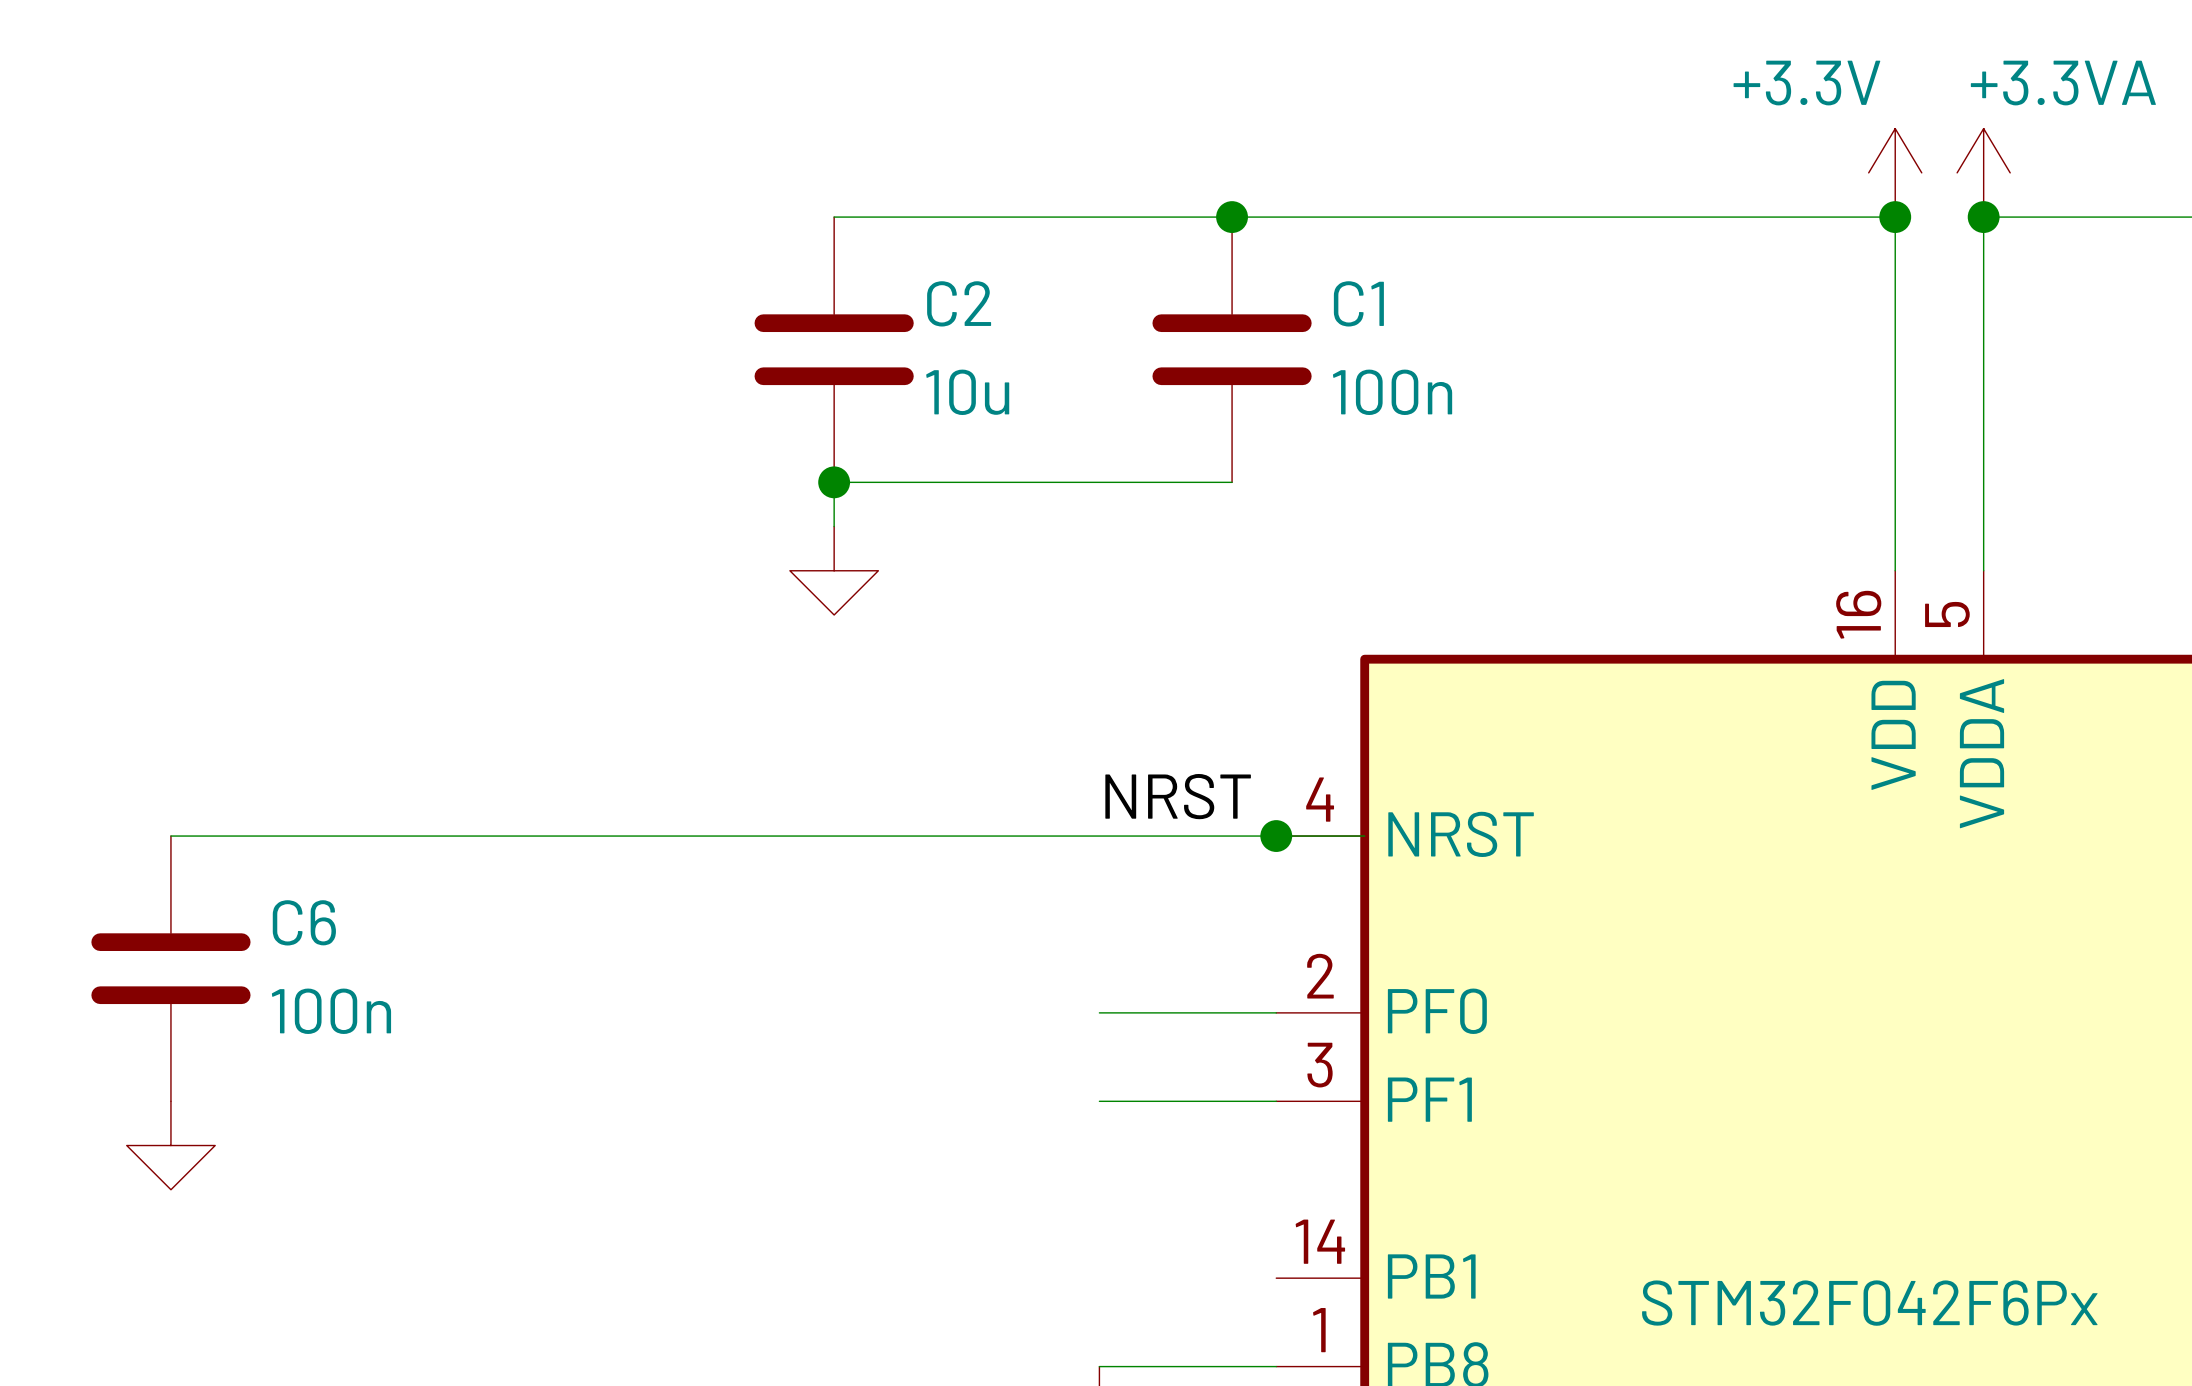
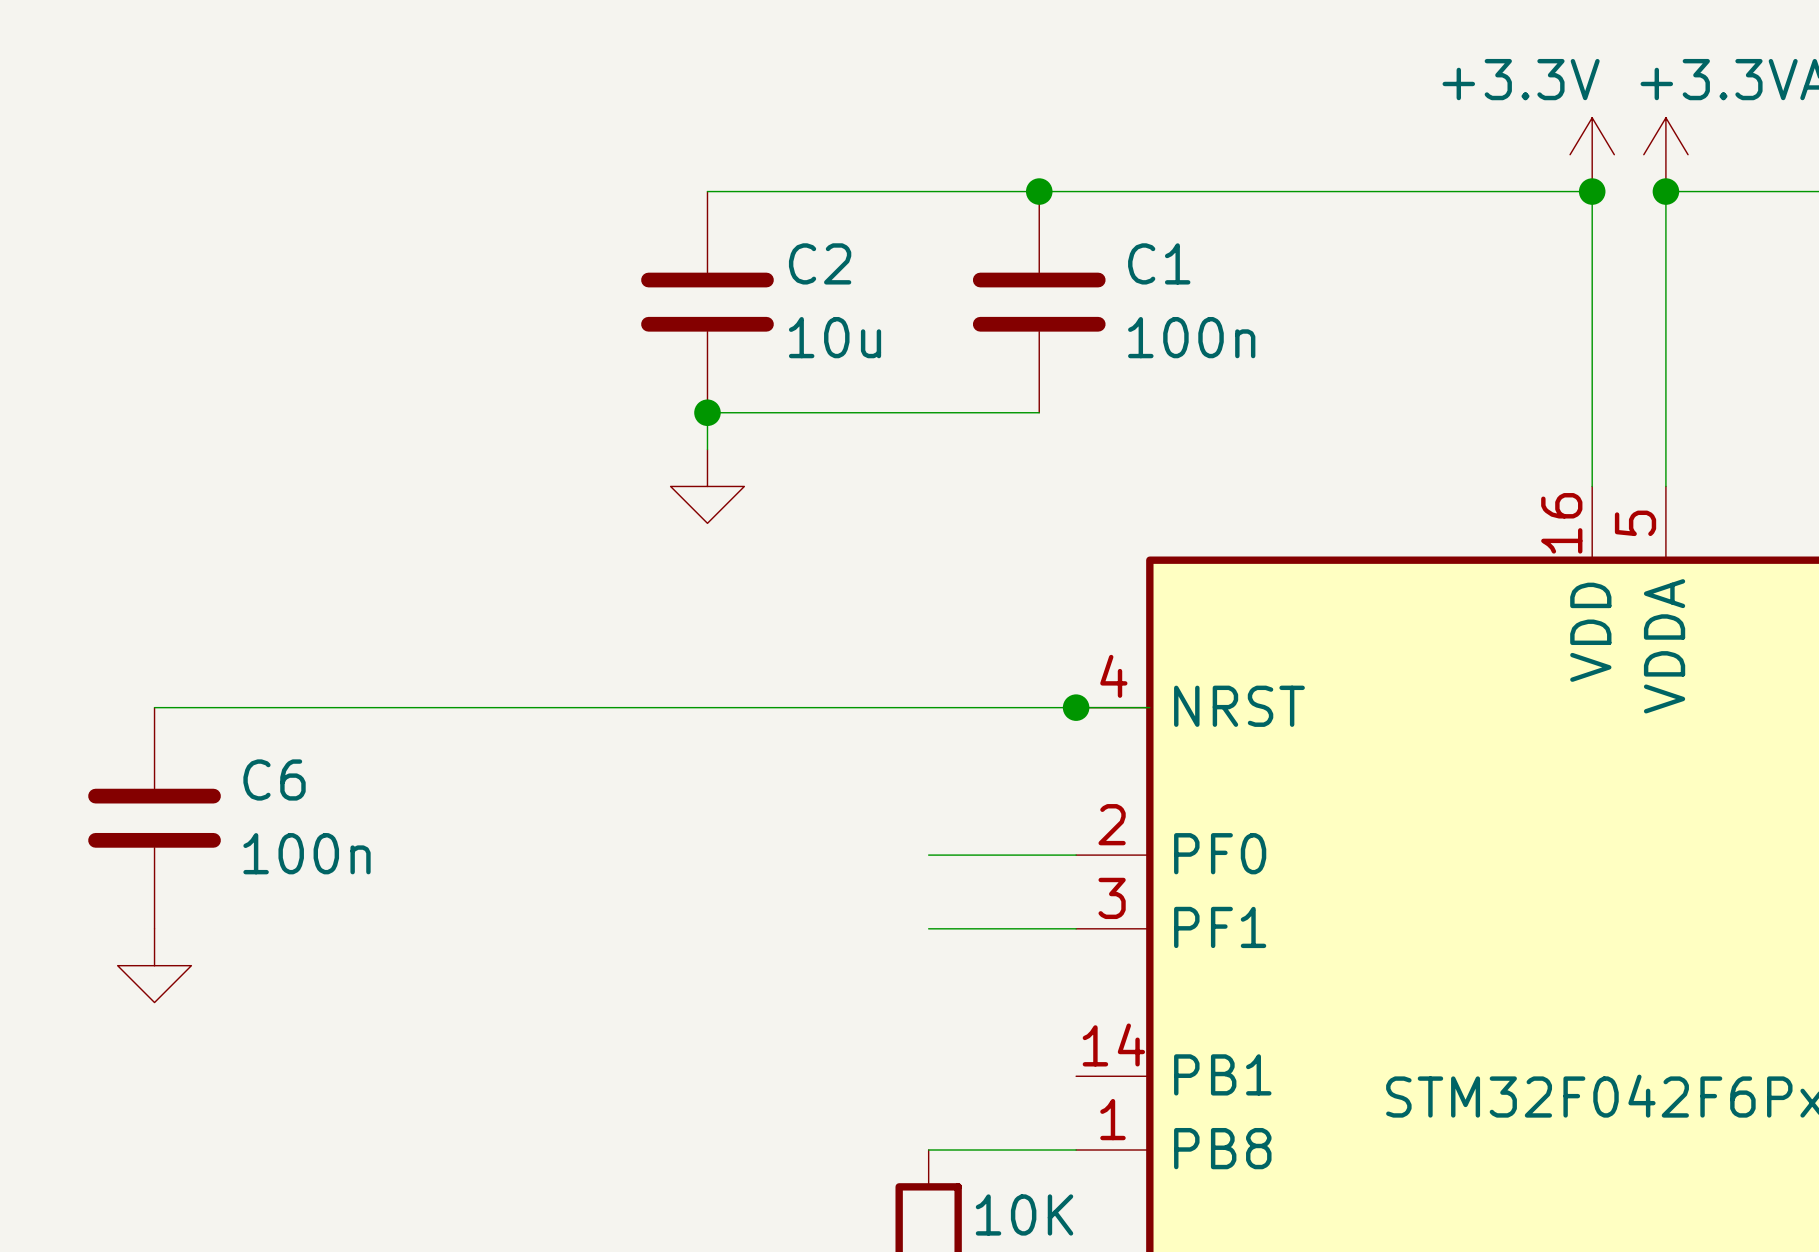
label: NRST (1178, 796) -> none

